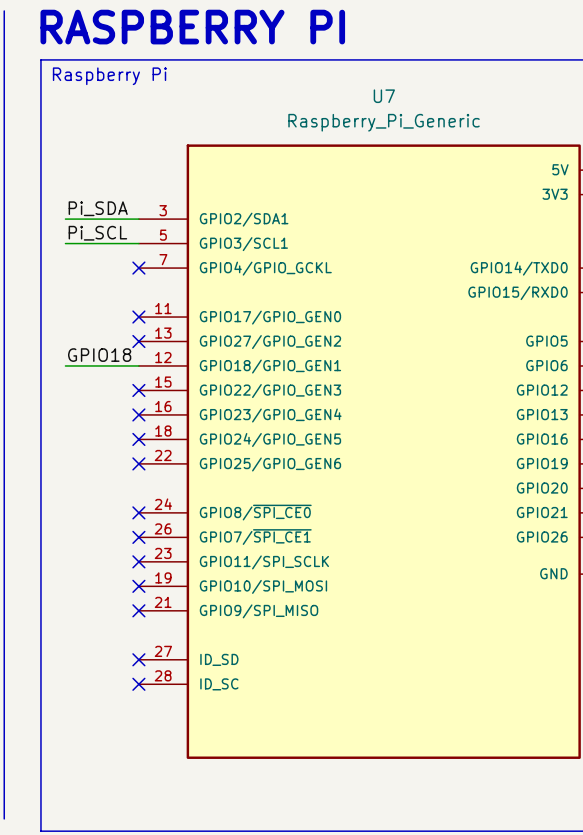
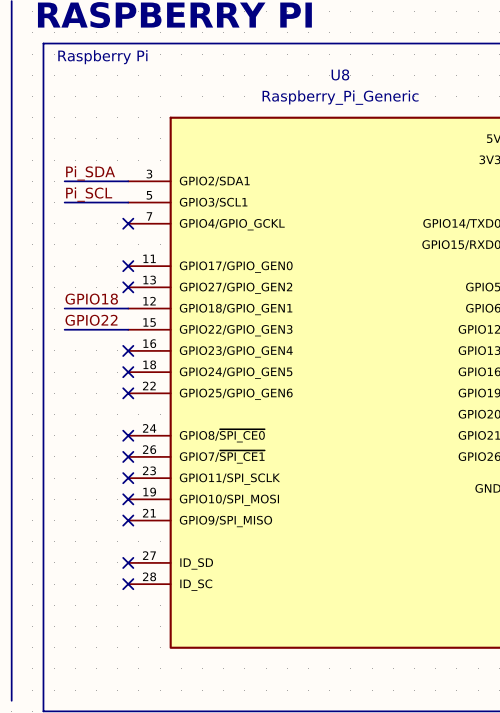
U7 name: U7 (384, 96) -> U8 (340, 74)
label: none -> GPIO22 (91, 320)
wire: none -> (64, 329) (128, 329)
no-connect mark: (138, 390) -> none

